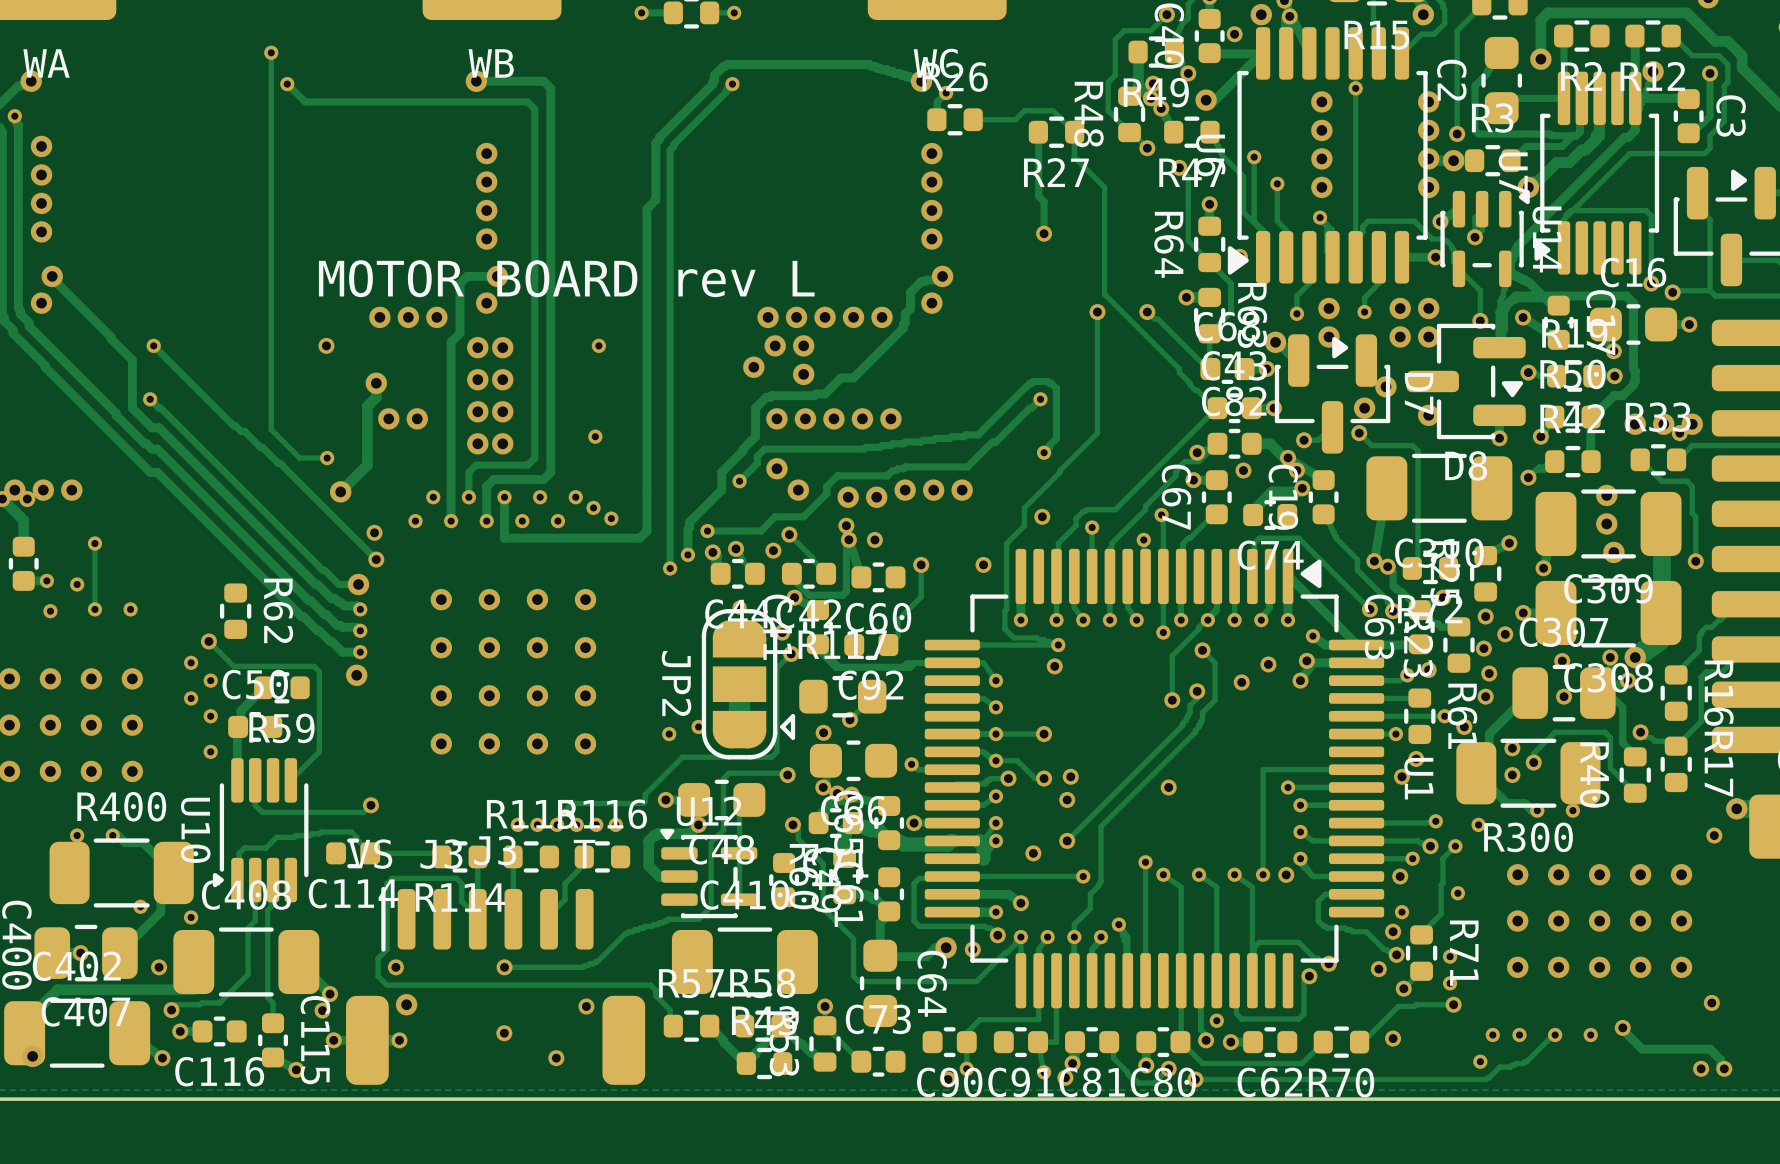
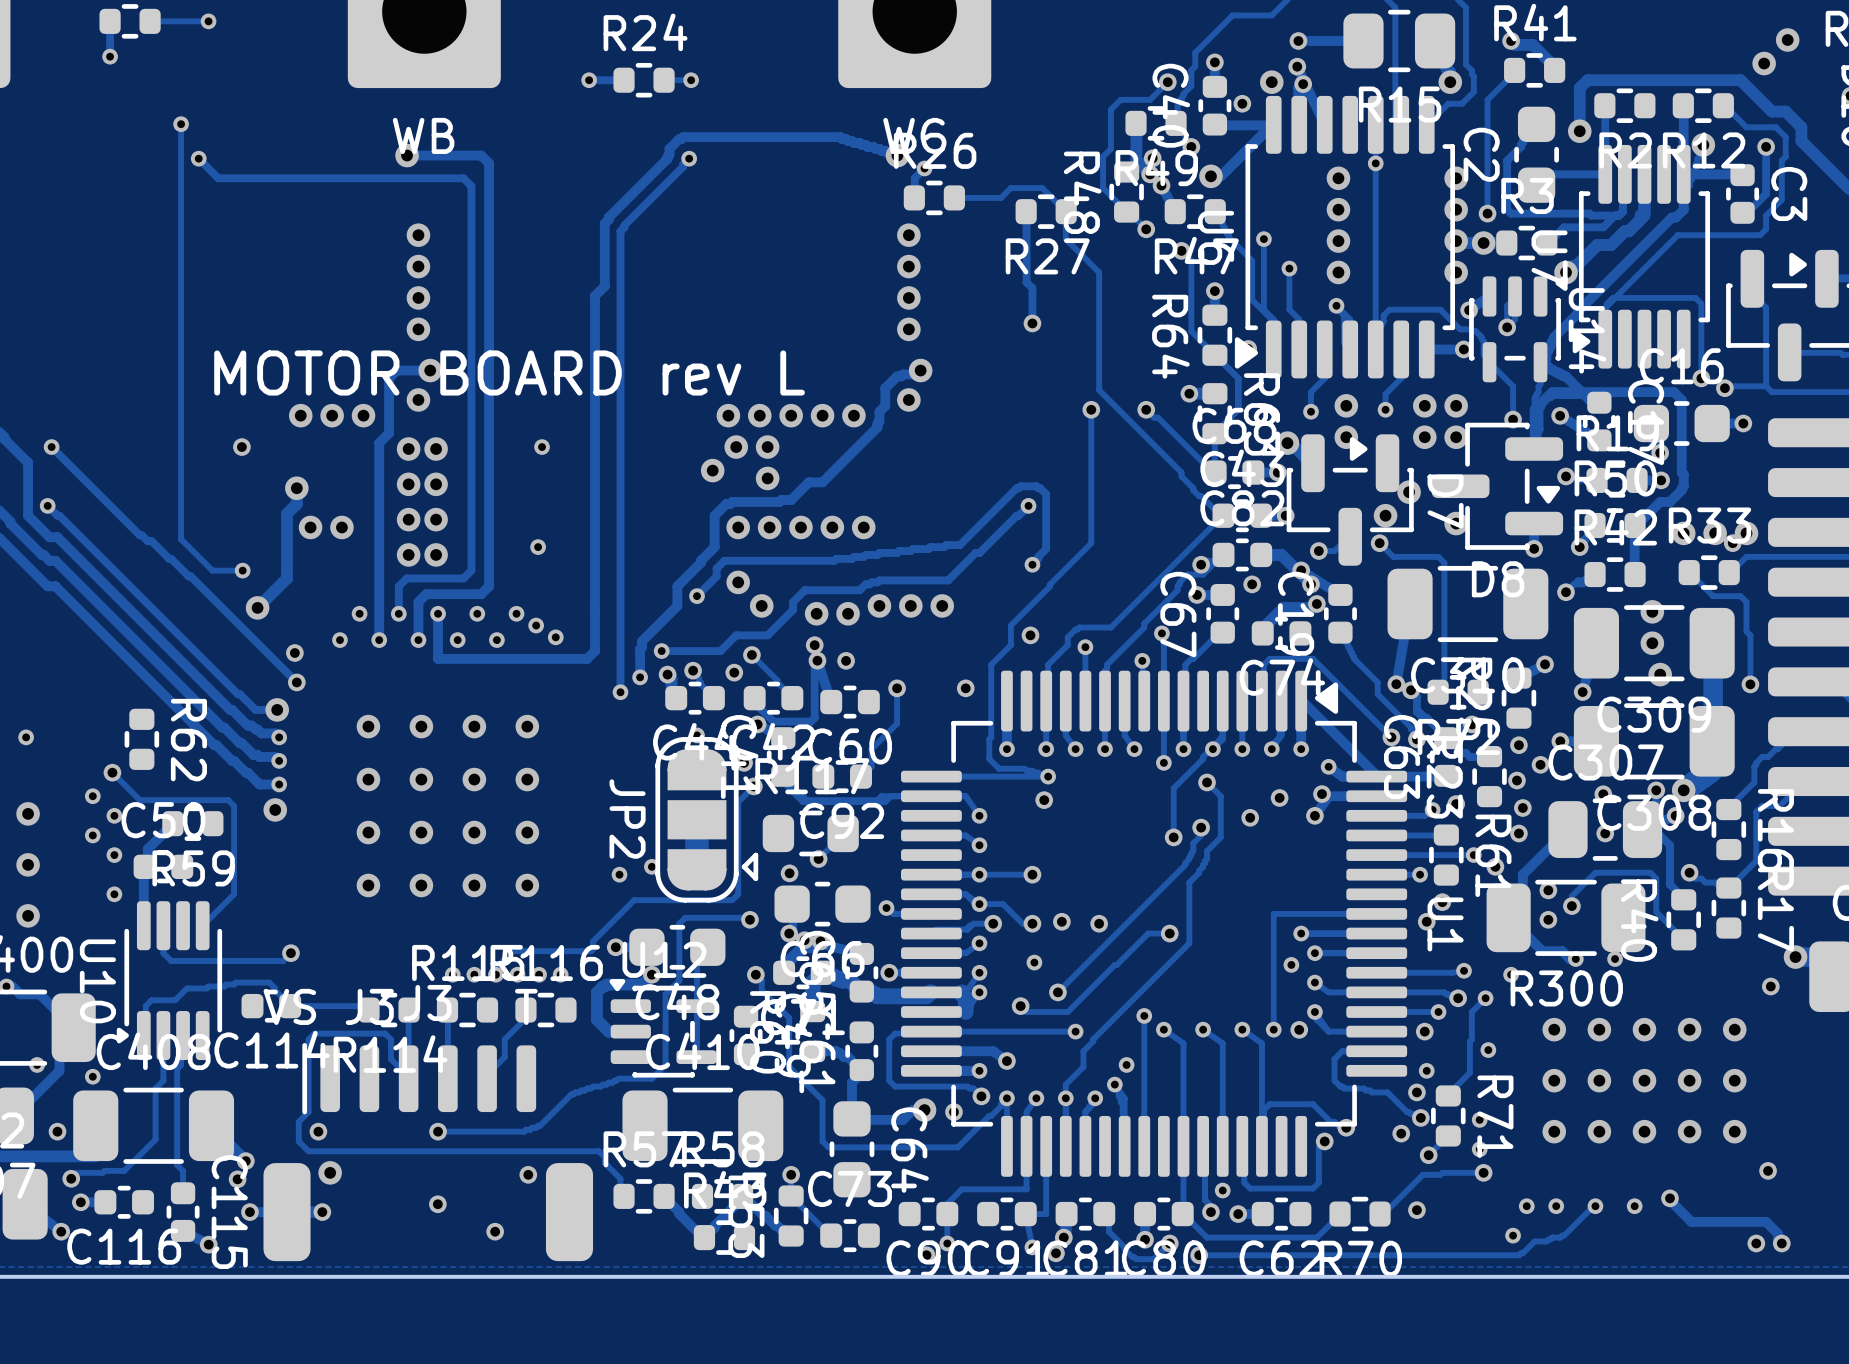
track: (1186, 741) (1101, 826) (1101, 881) -> (1189, 882) (1189, 943) (1095, 1037)
track: none -> (1169, 933) (1148, 933) (1067, 1012) (1026, 1012) (1020, 1006)
via position: (1067, 799) -> (1099, 923)
via: none -> (1034, 962)
via: none -> (1291, 964)
via: none -> (1126, 1064)

